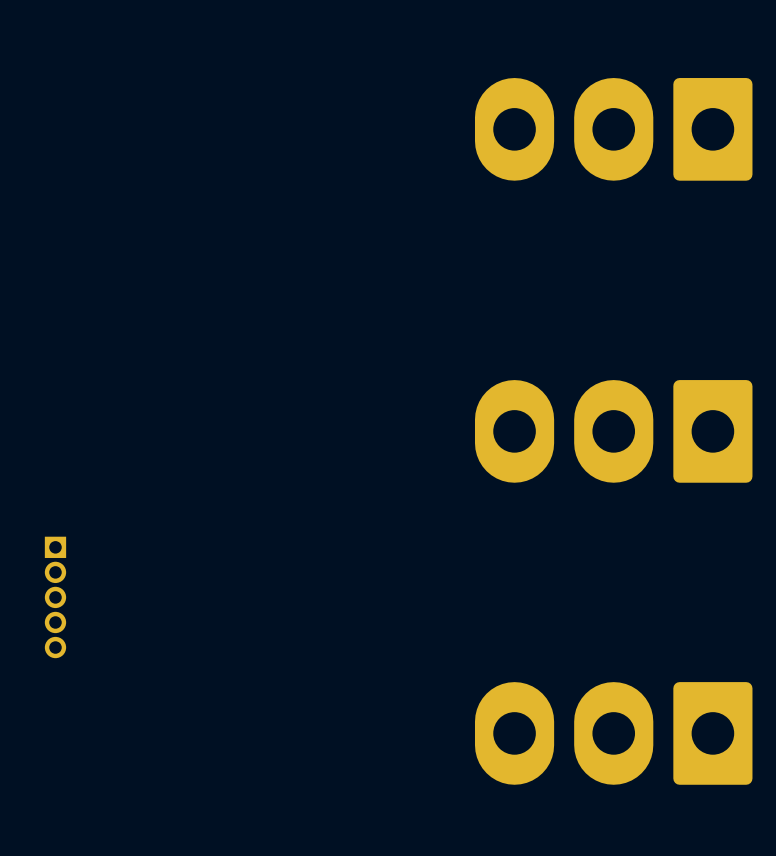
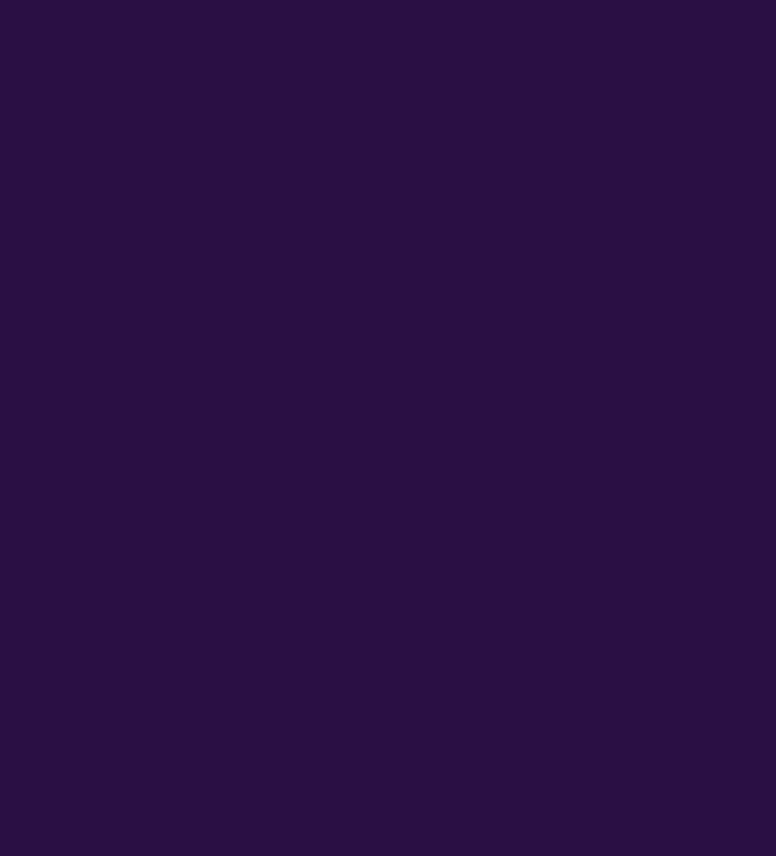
part: (613, 129) -> none
part: (613, 431) -> none
part: (55, 597) -> none
part: (613, 733) -> none

